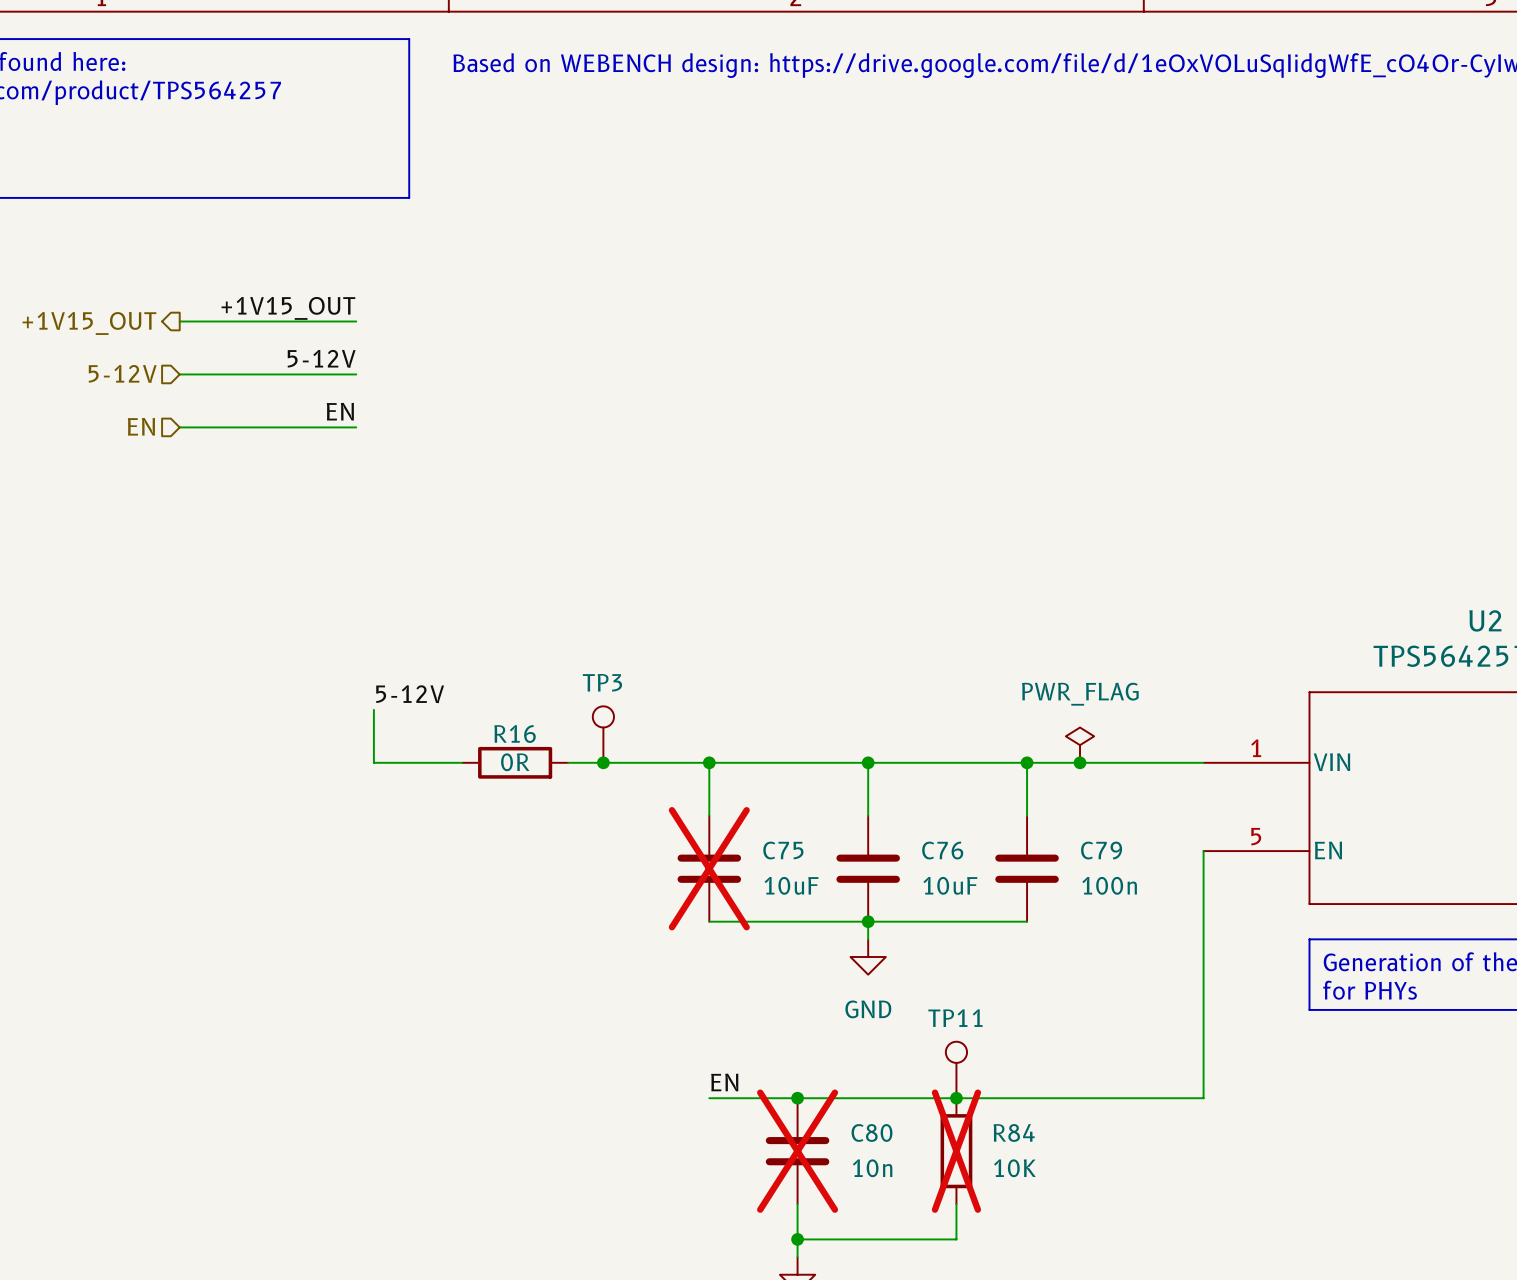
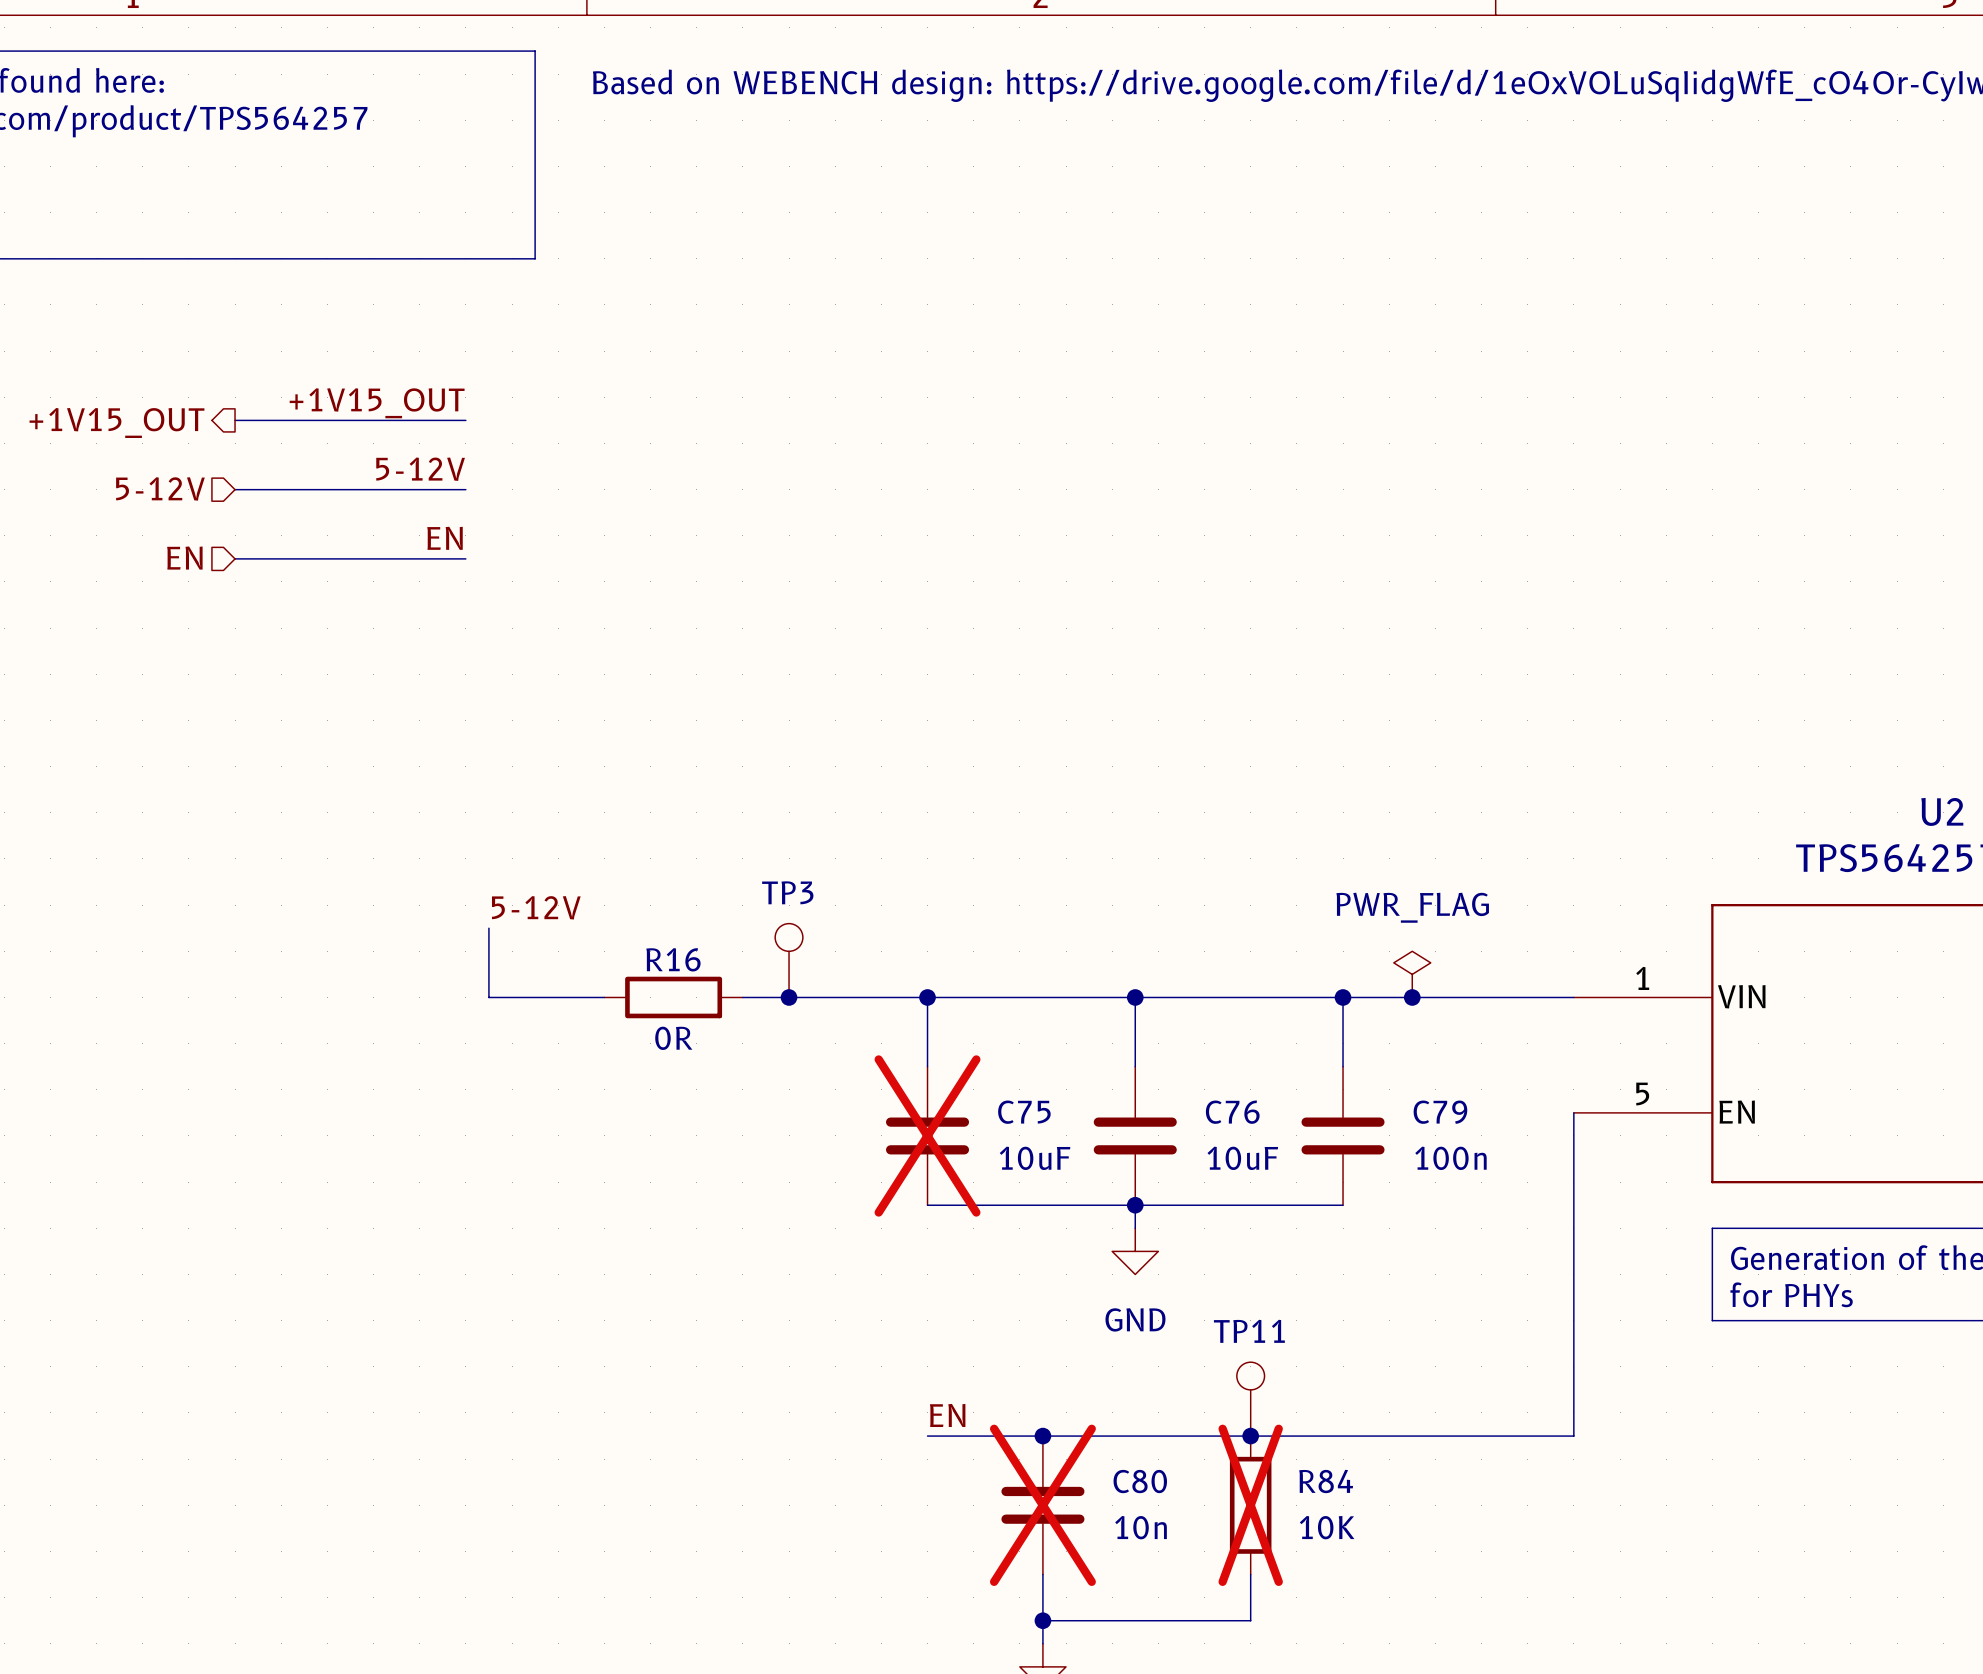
R16 value position: 0R (515, 762) -> 0R (673, 1038)

